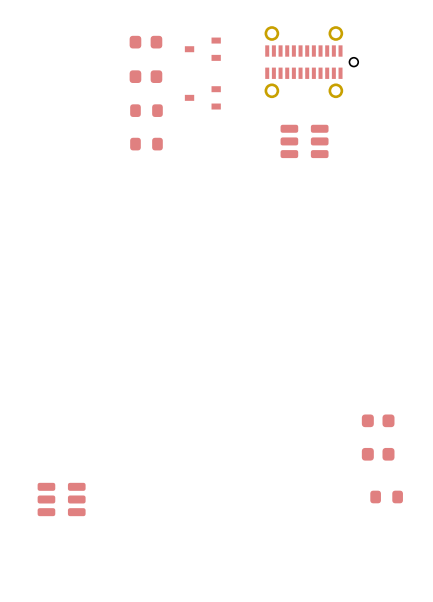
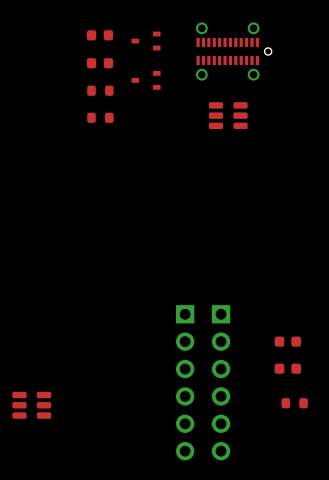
part: none -> (185, 382)
part: none -> (221, 382)

